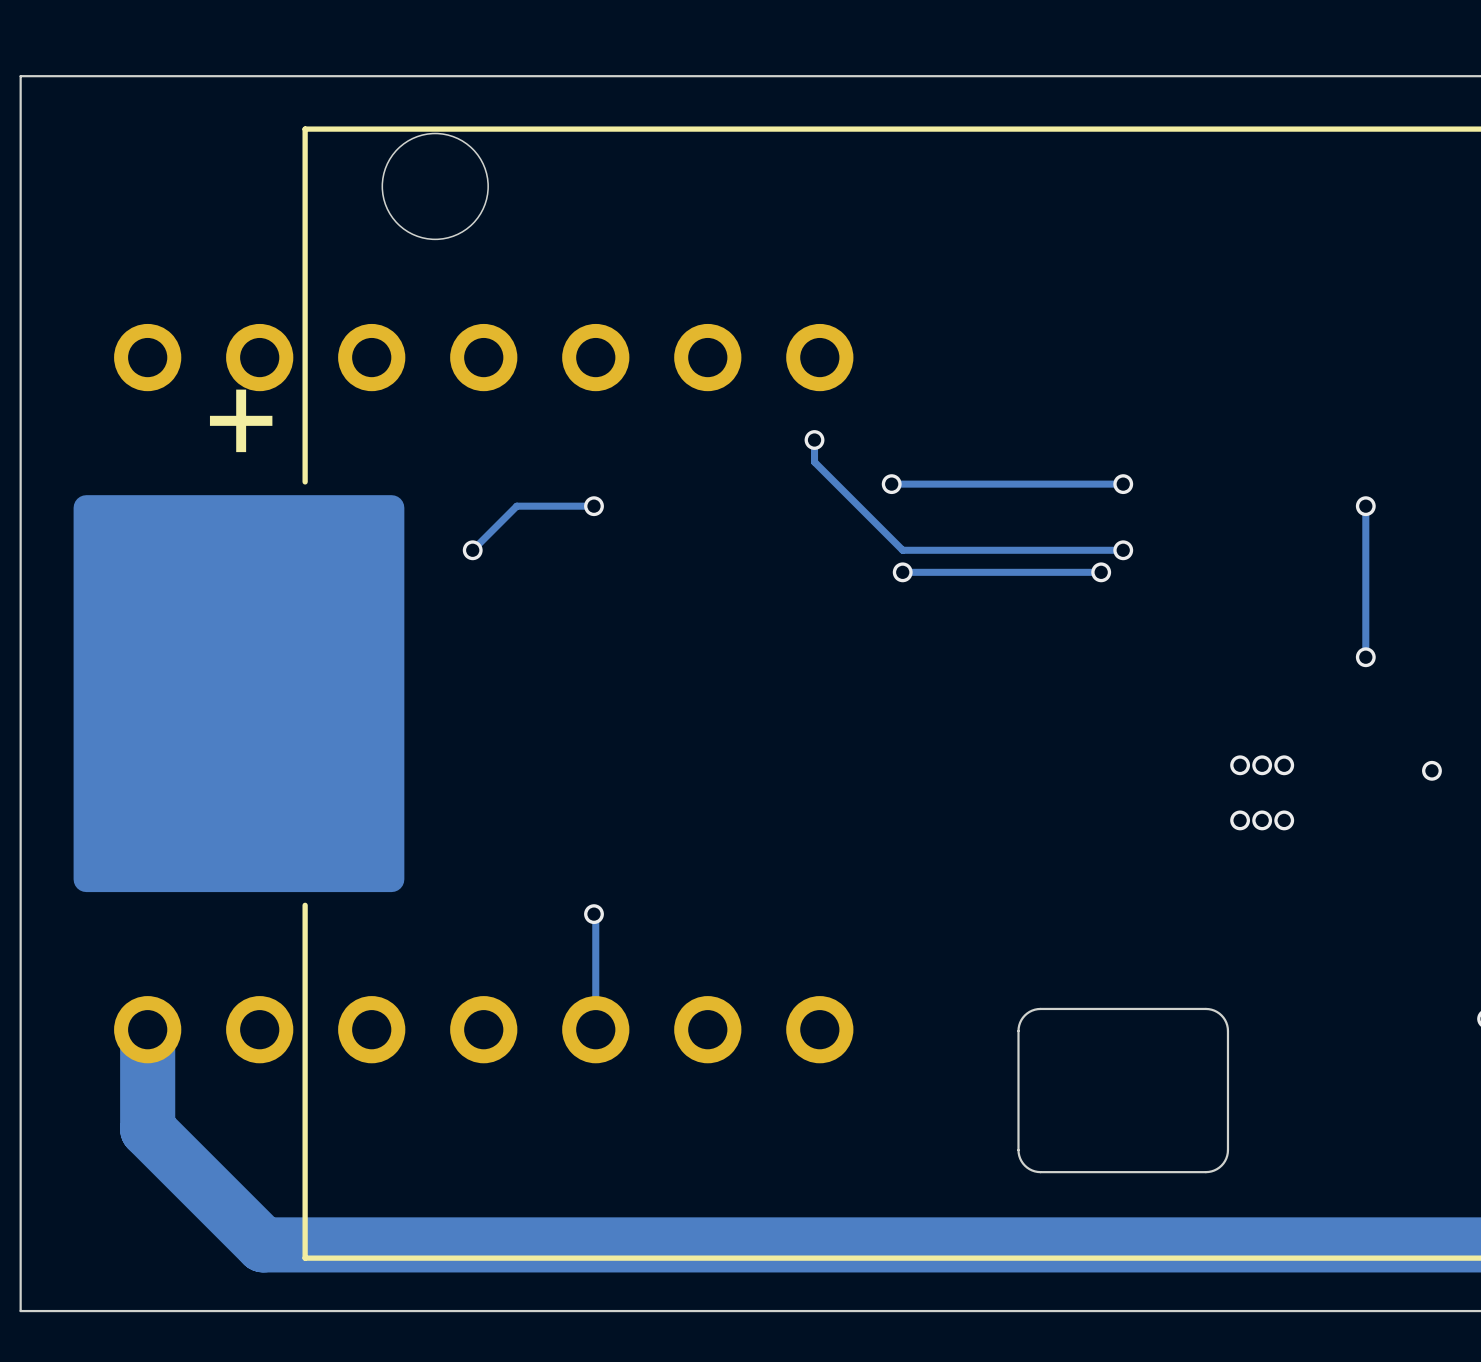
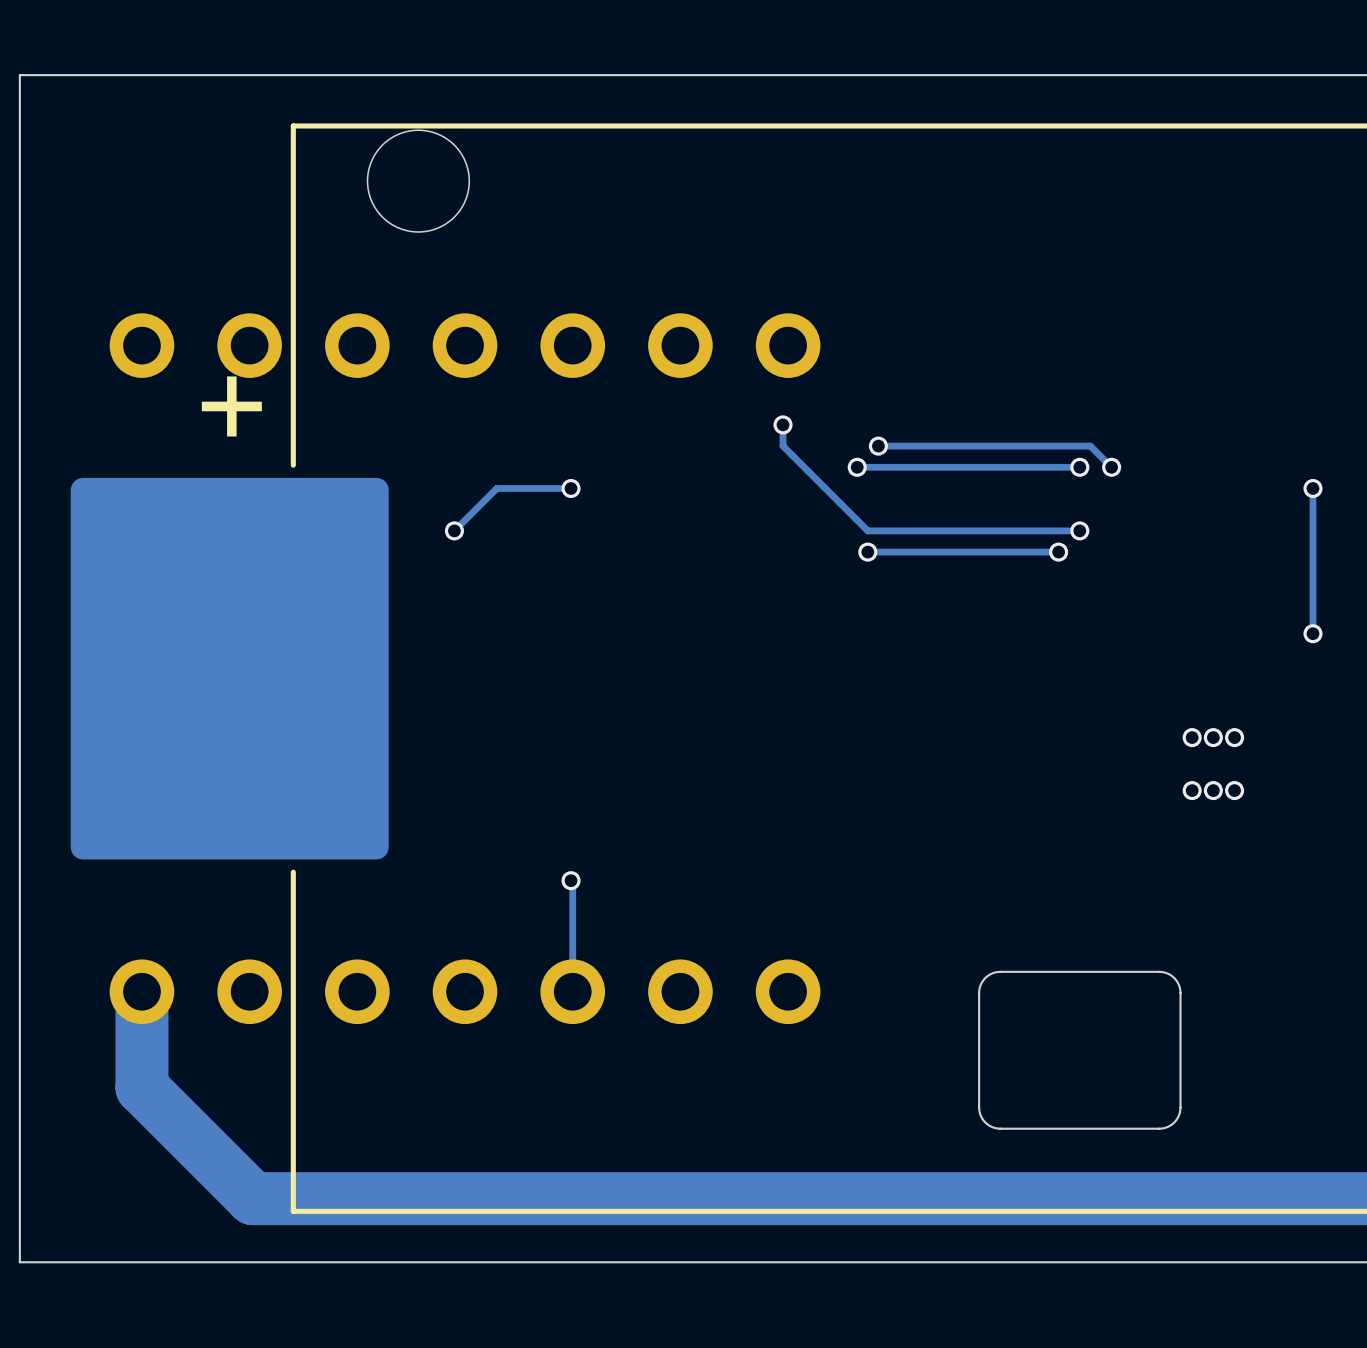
track: none -> (878, 446) (1090, 446) (1111, 467)
via: none -> (878, 446)
via: none -> (1111, 467)

